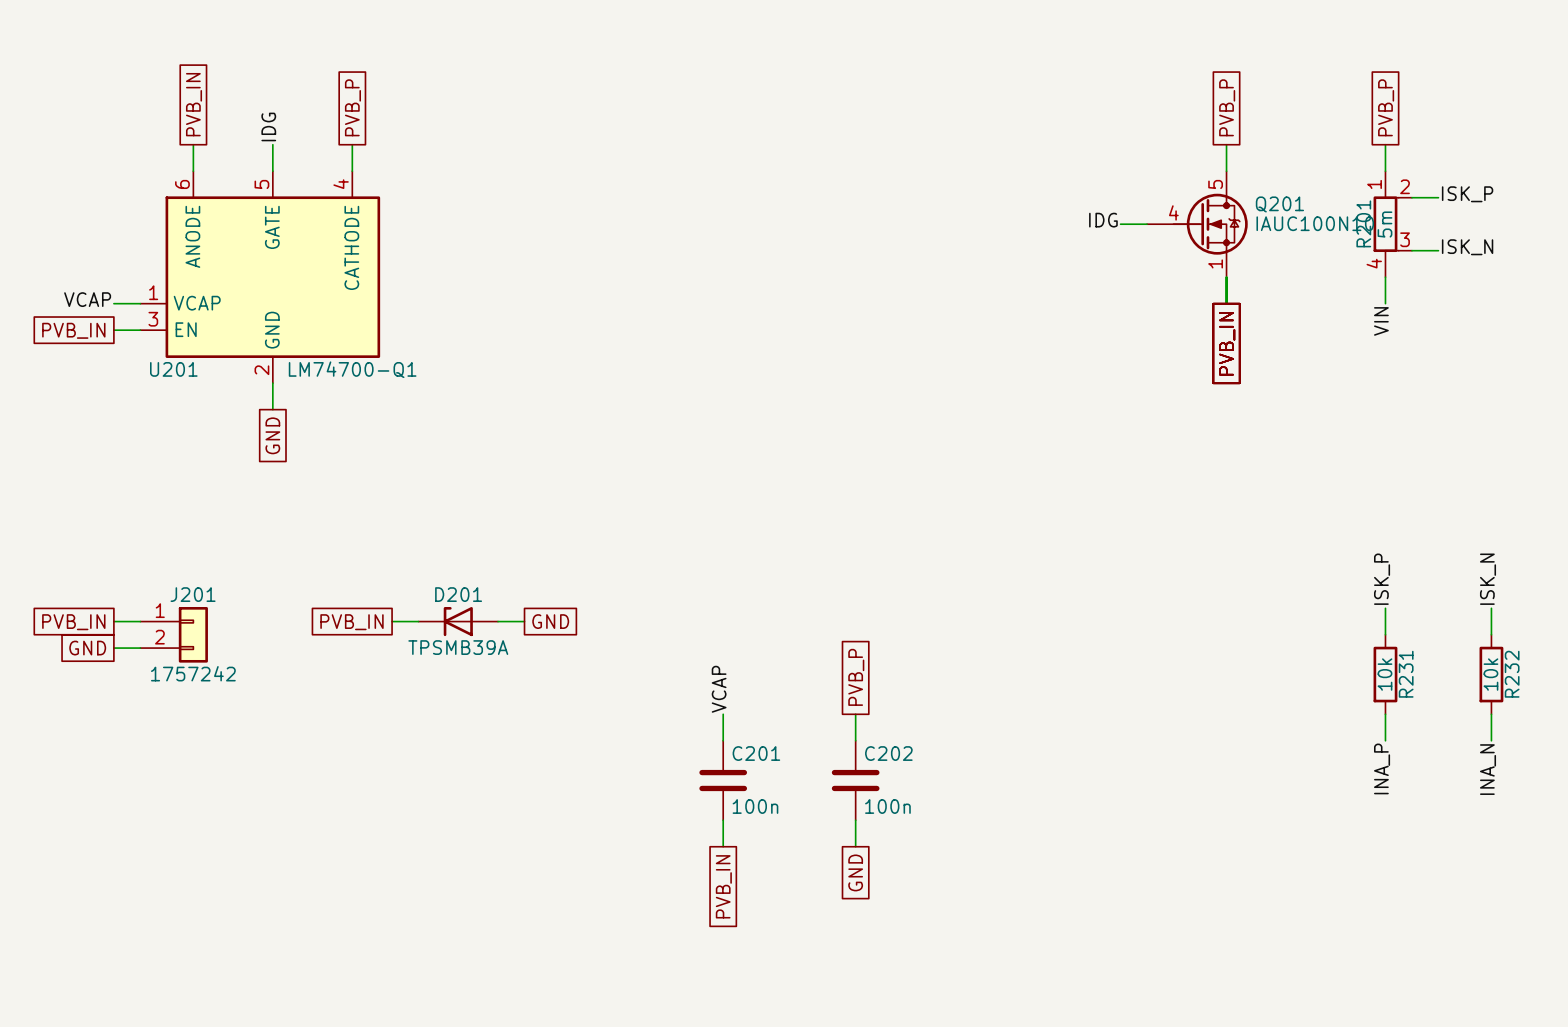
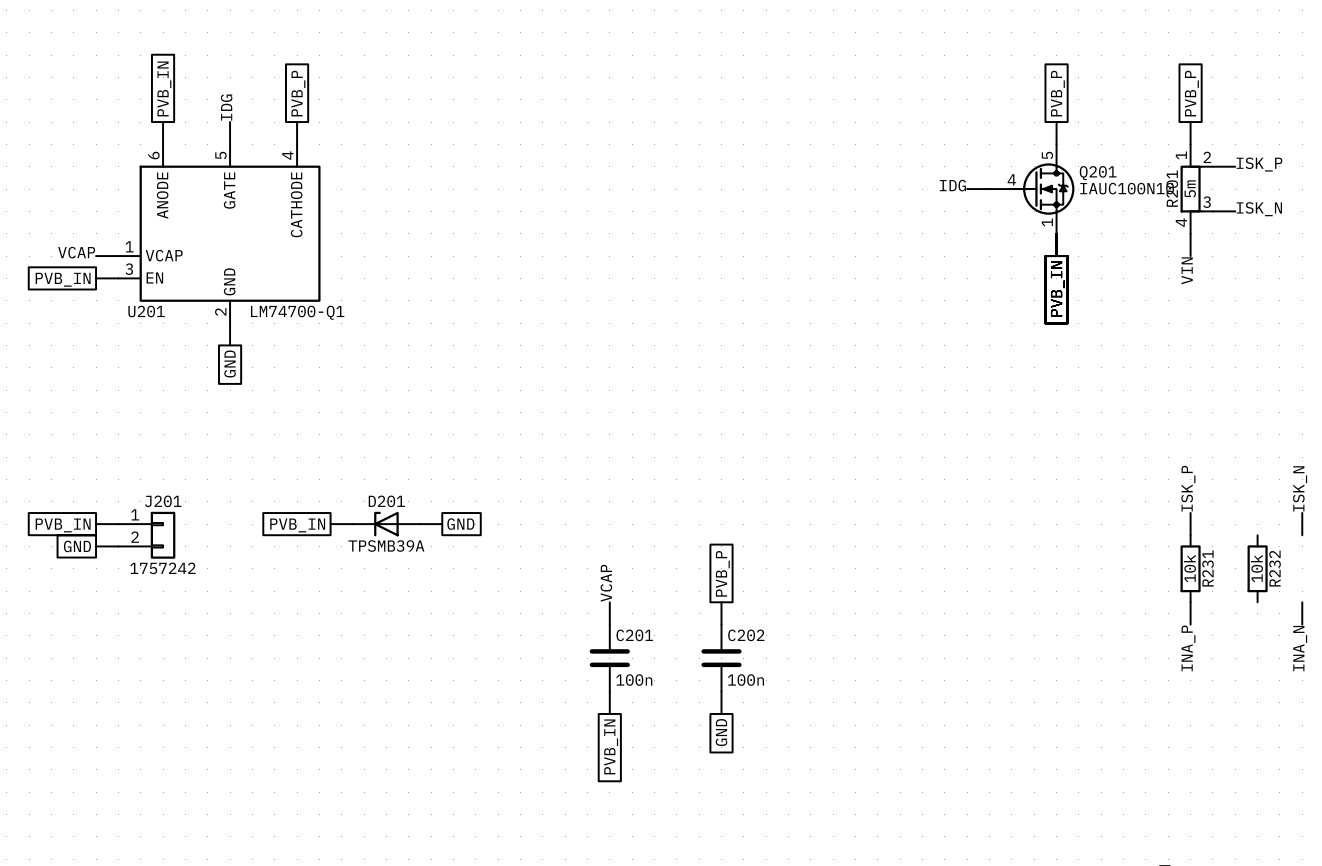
global label position: PVB_P (1227, 107) -> PVB_P (1057, 93)
global label position: PVB_P (1386, 107) -> PVB_P (1191, 93)
wire: (1226, 144) (1226, 171) -> (1056, 122) (1056, 144)
wire: (1385, 144) (1385, 171) -> (1190, 122) (1190, 144)
label position: ISK_P (1467, 194) -> ISK_P (1259, 164)
label position: IDG (1103, 220) -> IDG (952, 185)
Q201 position: (1197, 224) -> (1031, 189)
R201 position: (1392, 224) -> (1196, 189)
label position: ISK_N (1467, 247) -> ISK_N (1259, 209)
wire: (1226, 277) (1226, 303) -> (1056, 233) (1056, 256)
wire: (1385, 277) (1385, 303) -> (1190, 233) (1190, 256)
label position: VIN (1381, 321) -> VIN (1187, 270)
global label position: PVB_IN (1227, 343) -> PVB_IN (1057, 288)
label position: ISK_P (1382, 579) -> ISK_P (1188, 488)
label position: ISK_N (1488, 579) -> ISK_N (1300, 488)
wire: (1385, 608) (1385, 634) -> (1190, 512) (1190, 535)
wire: (1491, 608) (1491, 634) -> (1302, 512) (1302, 535)
R231 position: (1385, 674) -> (1190, 568)
wire: (1385, 714) (1385, 740) -> (1190, 602) (1190, 624)
wire: (1491, 714) (1491, 740) -> (1302, 602) (1302, 624)
label position: INA_P (1382, 768) -> INA_P (1188, 648)
label position: INA_N (1488, 769) -> INA_N (1300, 648)

